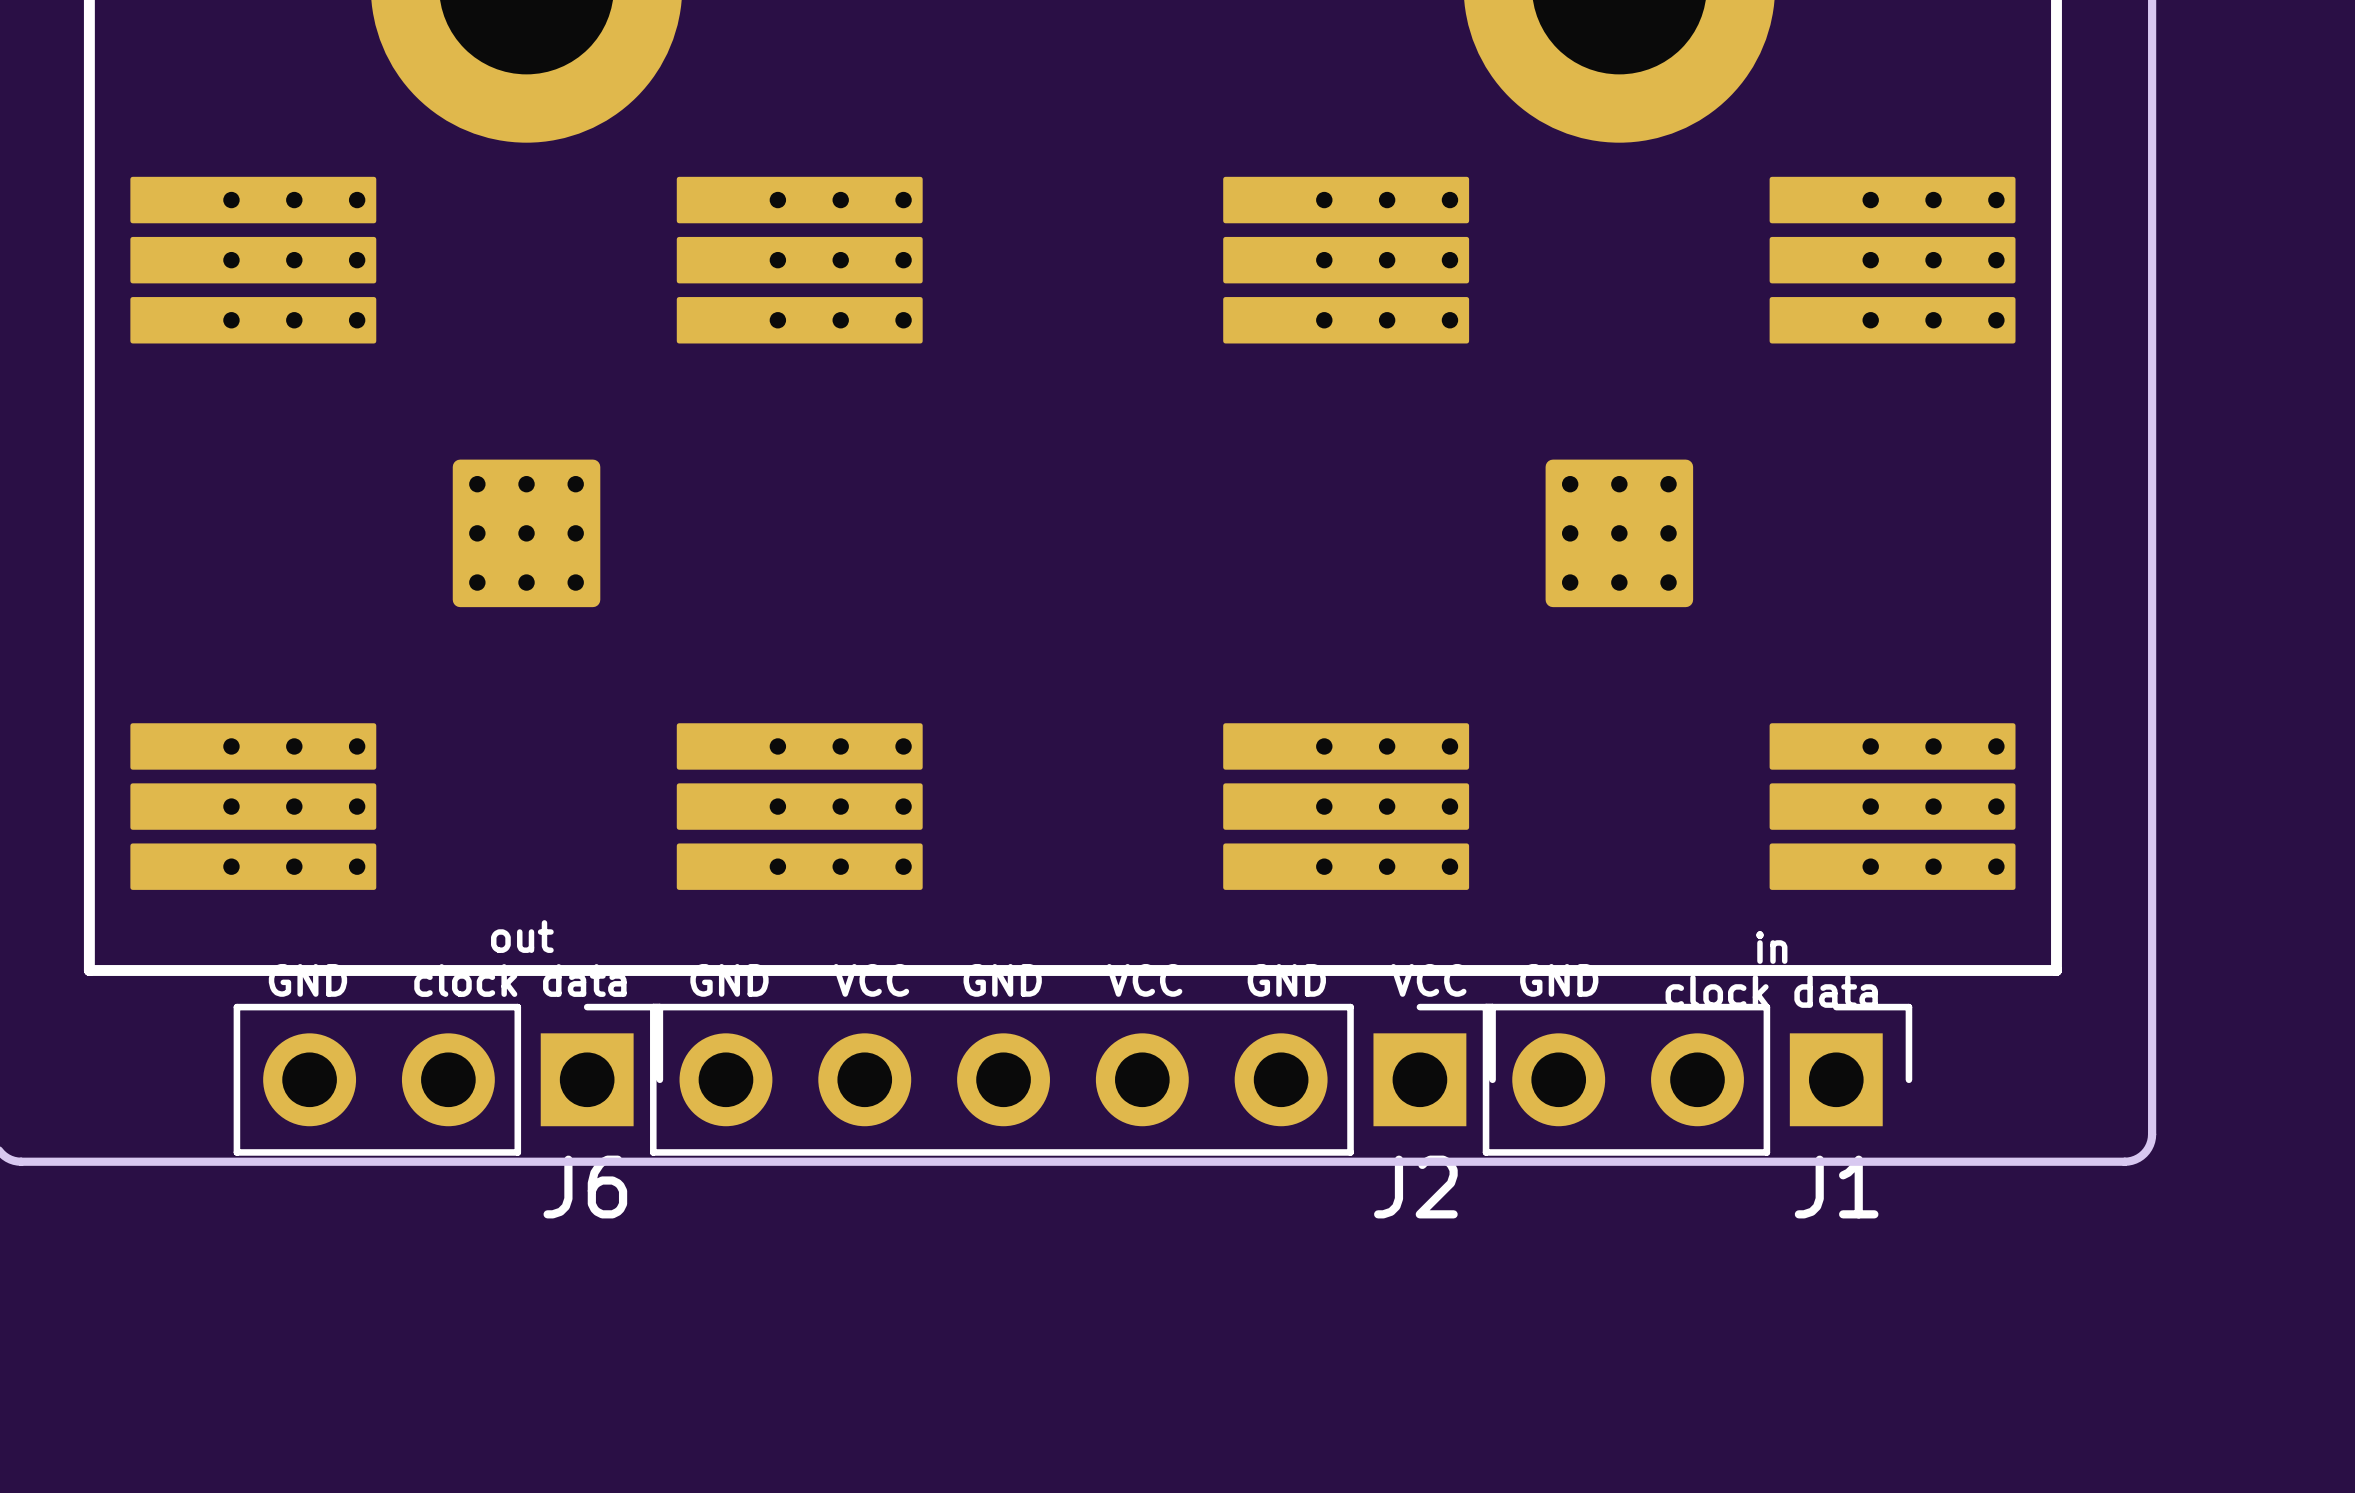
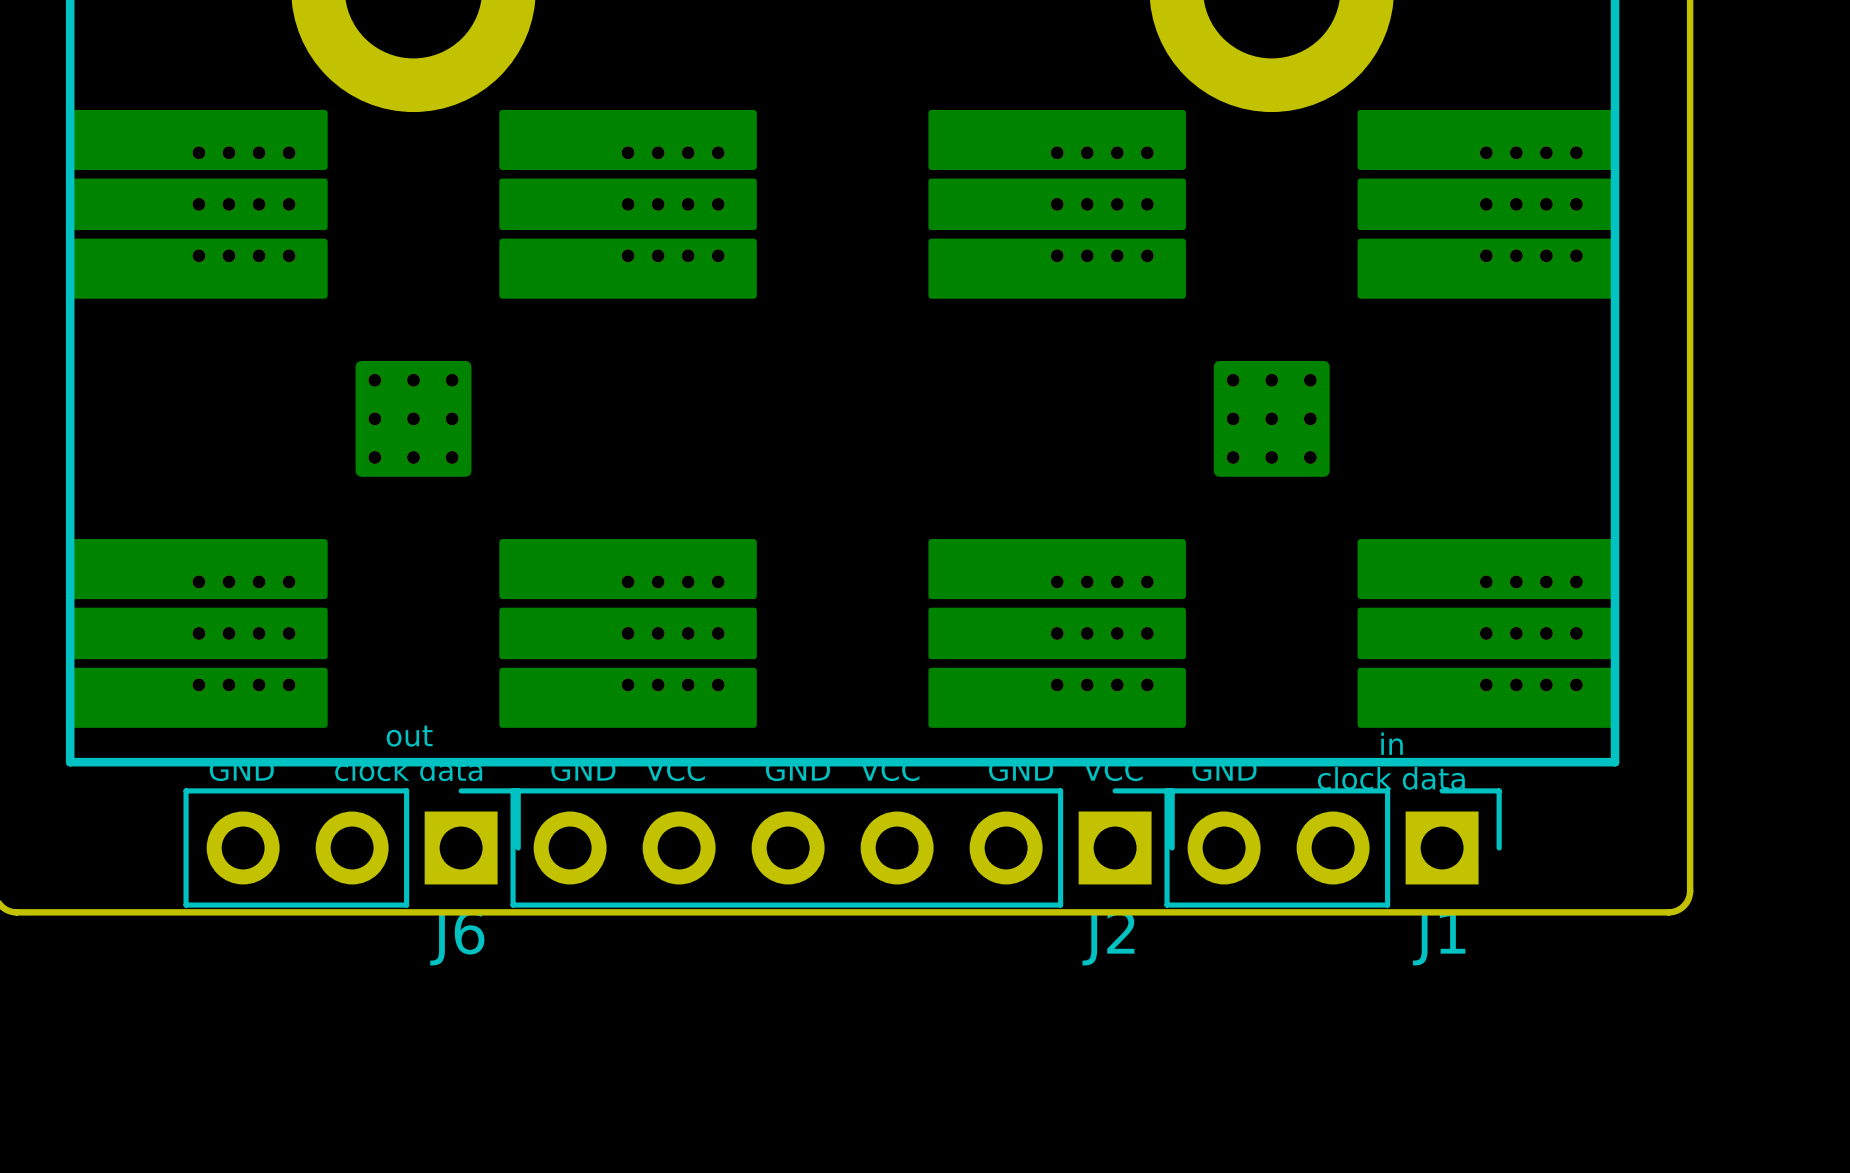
part footprint: [130, 176, 377, 344] -> [70, 109, 328, 299]
part footprint: [676, 176, 923, 344] -> [499, 109, 757, 299]
part footprint: [1223, 176, 1470, 344] -> [928, 109, 1186, 299]
part footprint: [1769, 176, 2016, 344] -> [1357, 109, 1616, 299]
part footprint: [130, 723, 377, 890] -> [70, 539, 328, 728]
part footprint: [676, 723, 923, 890] -> [499, 539, 757, 728]
part footprint: [1223, 723, 1470, 890] -> [928, 539, 1186, 728]
part footprint: [1769, 723, 2016, 890] -> [1357, 539, 1616, 728]

